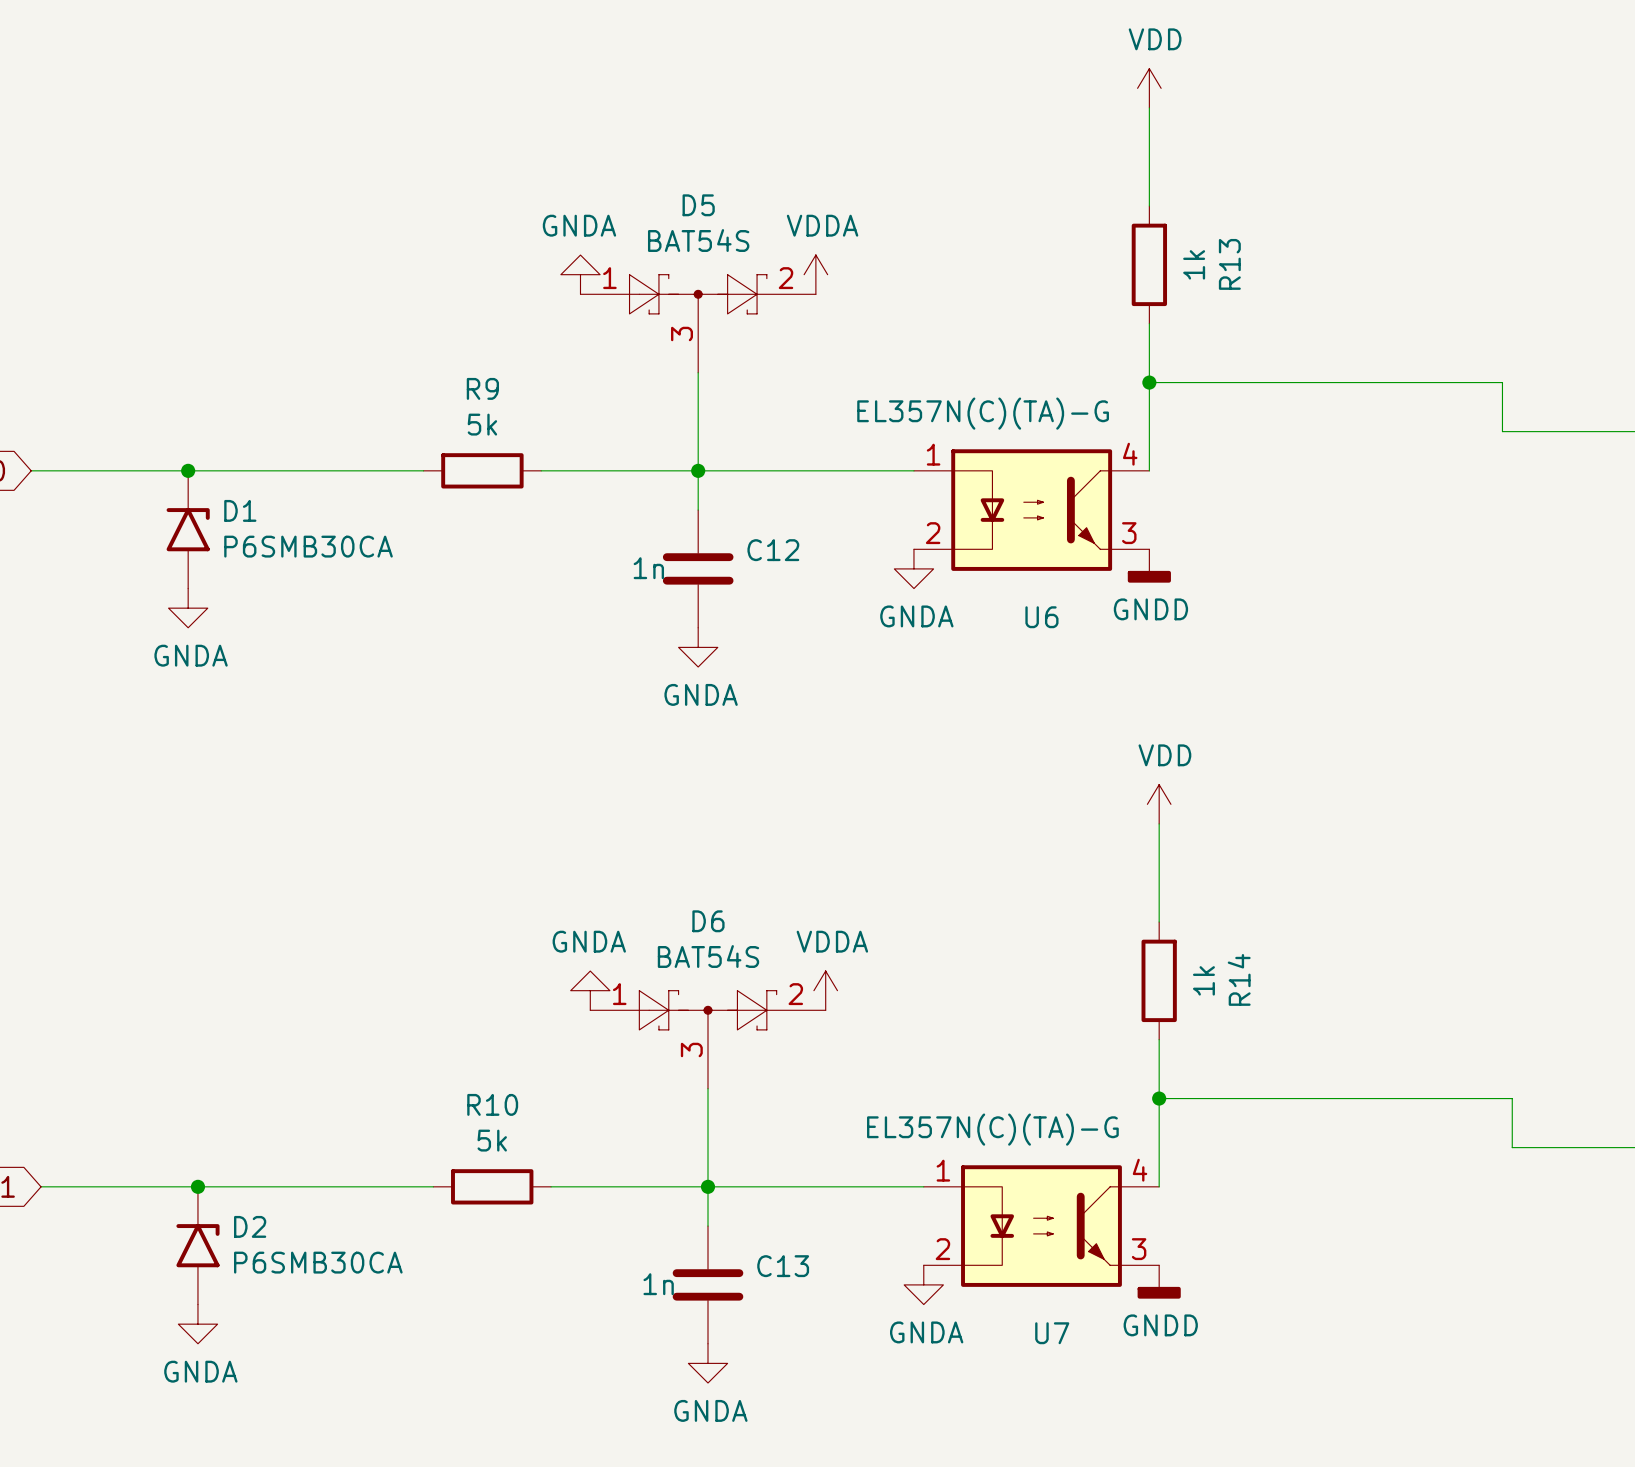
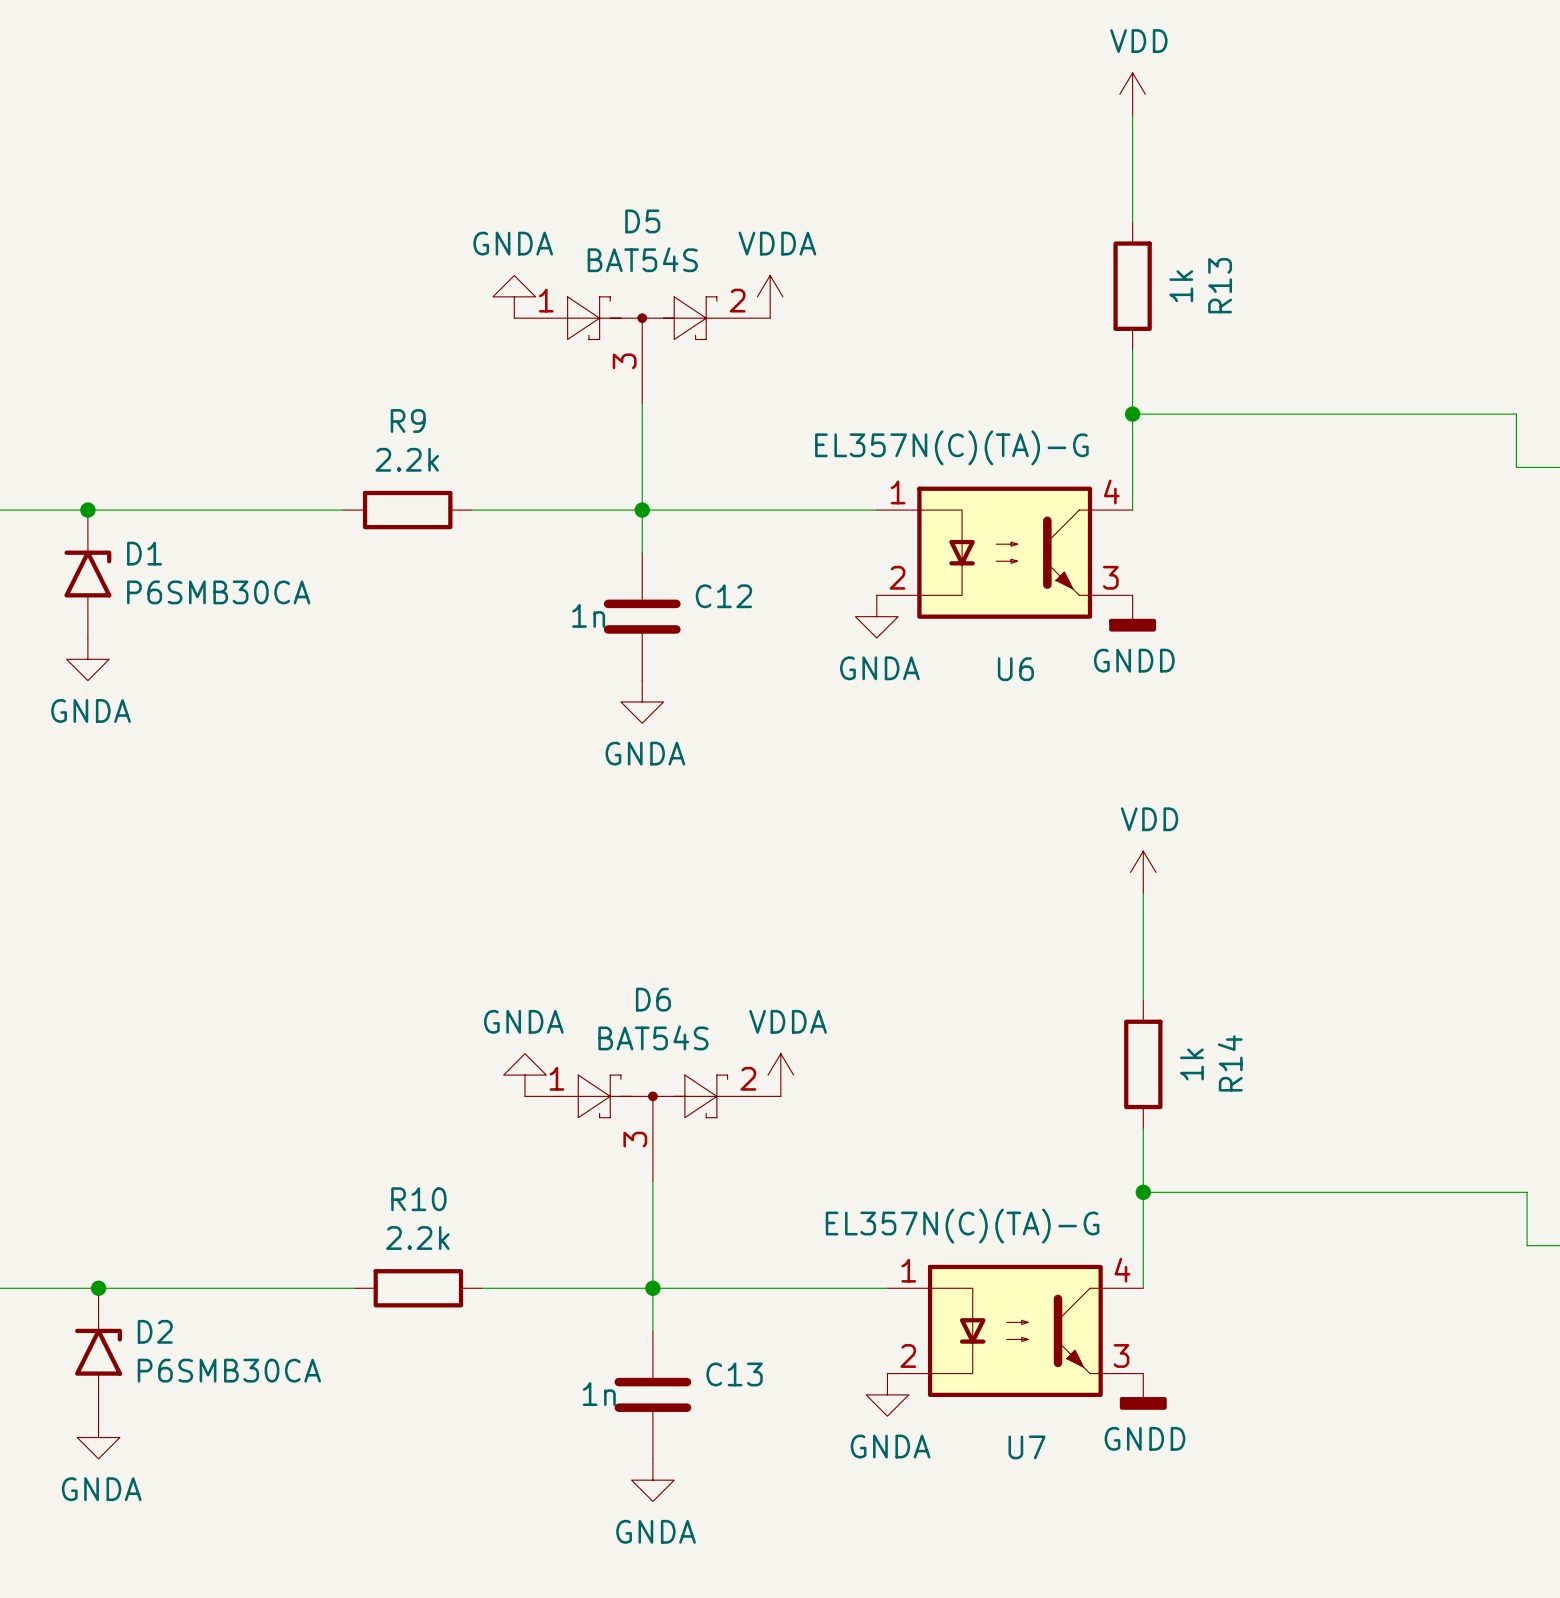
R9 value: 5k (482, 424) -> 2.2k (407, 459)
R10 value: 5k (492, 1140) -> 2.2k (417, 1238)

